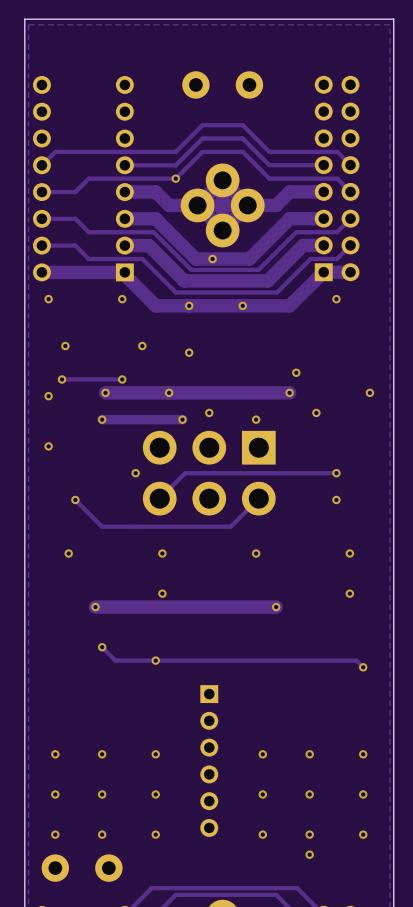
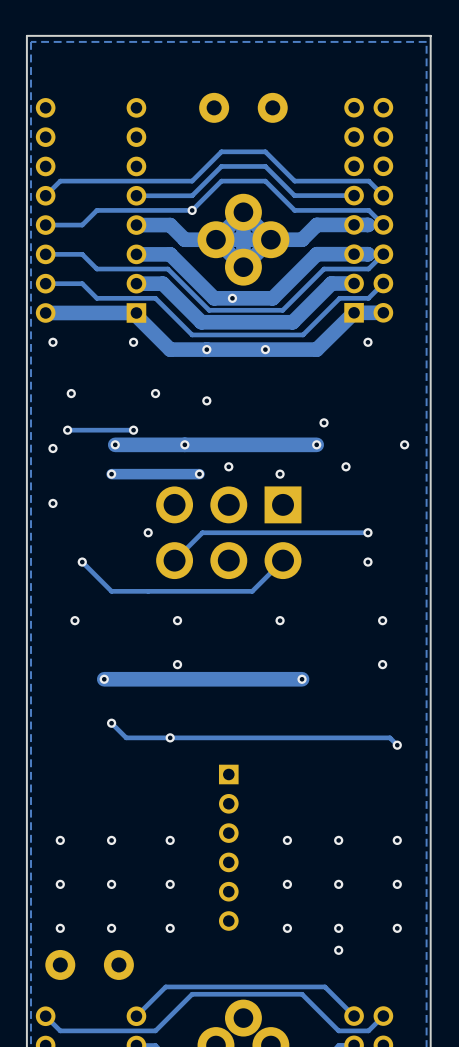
track: none -> (354, 224) (367, 225)
track: none -> (354, 254) (367, 254)

